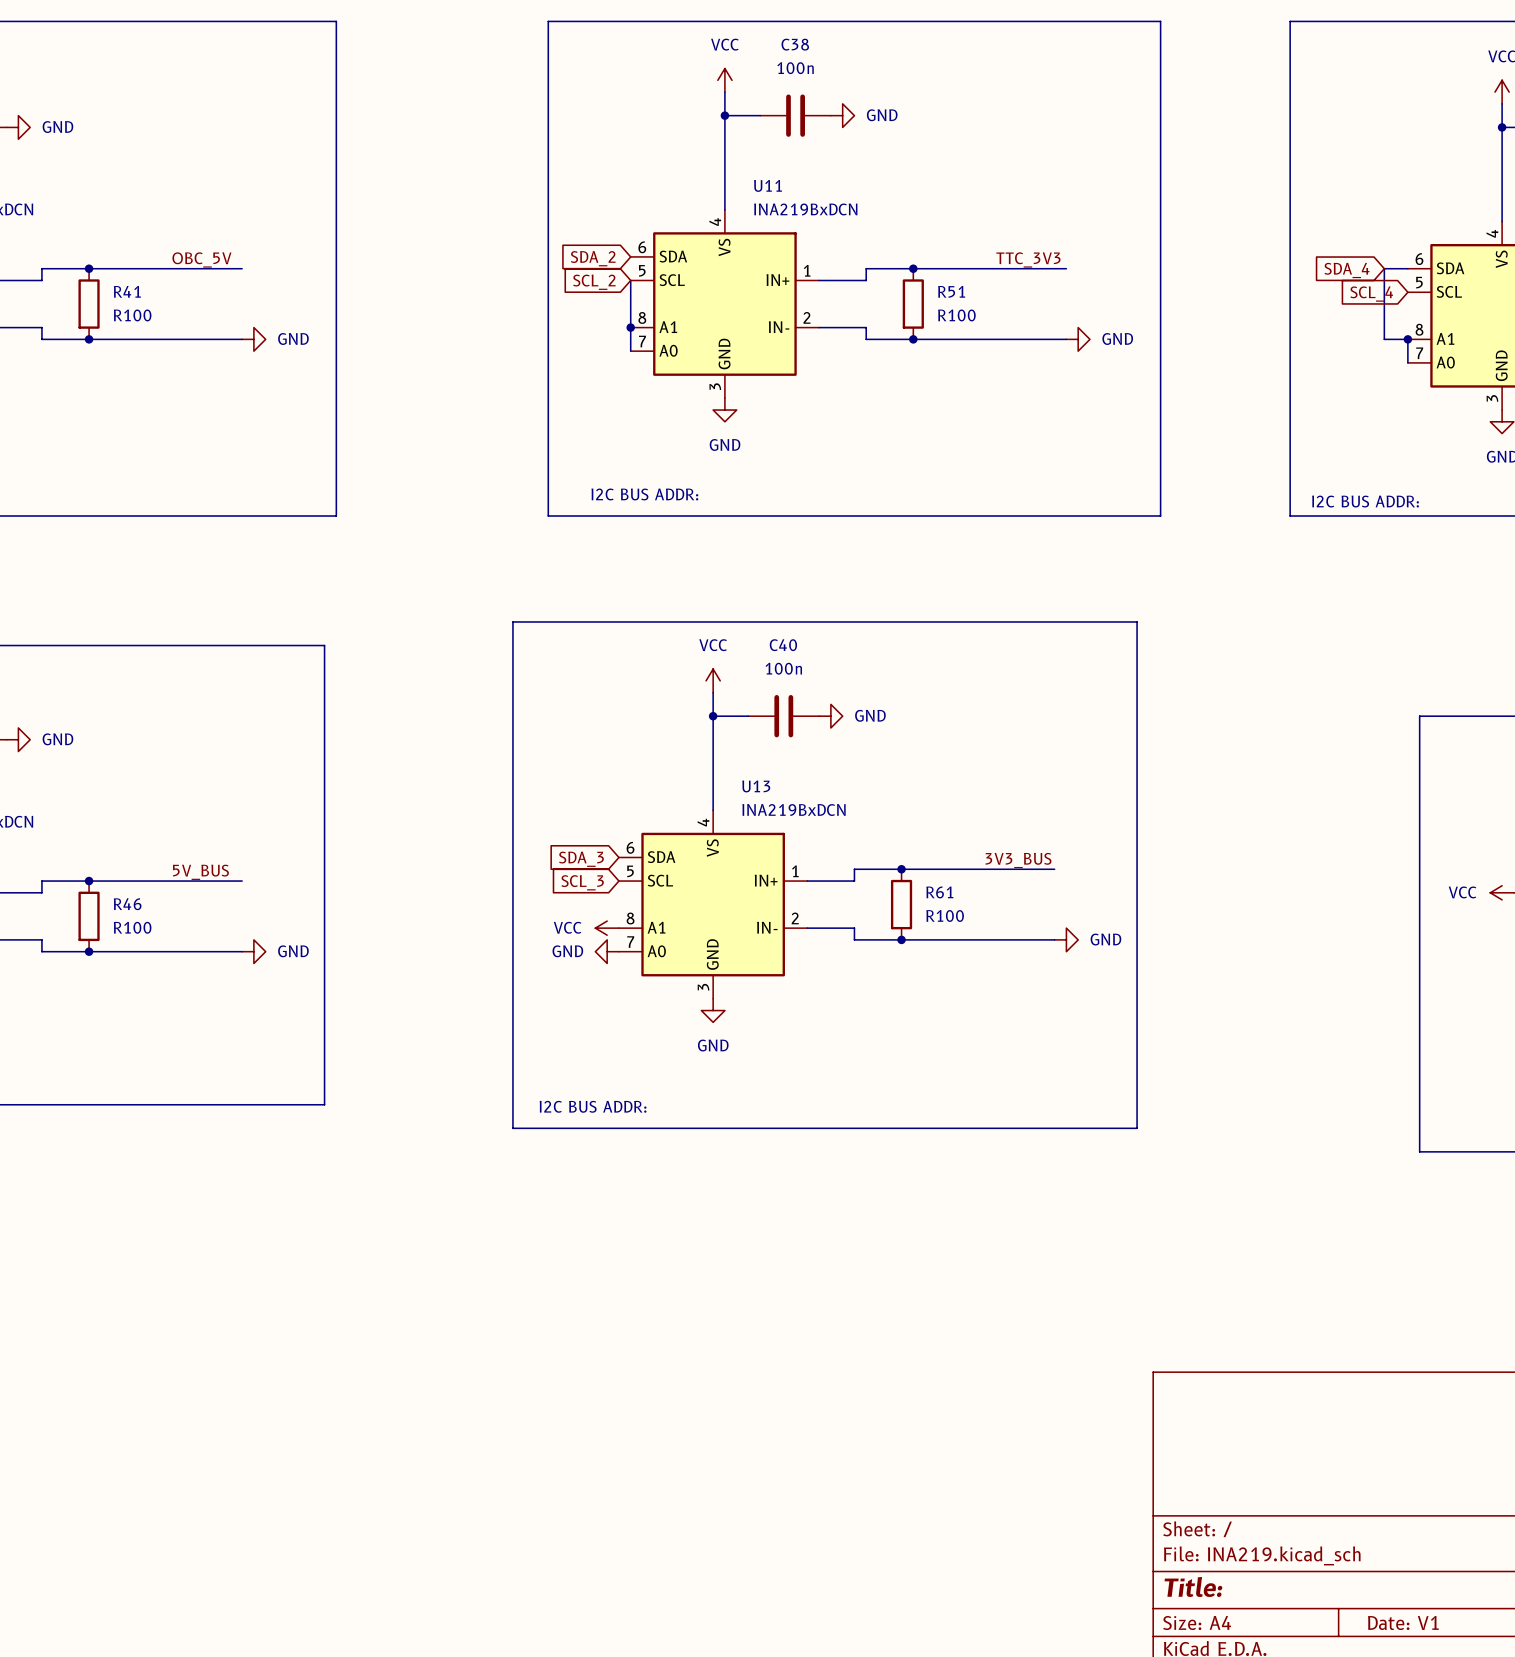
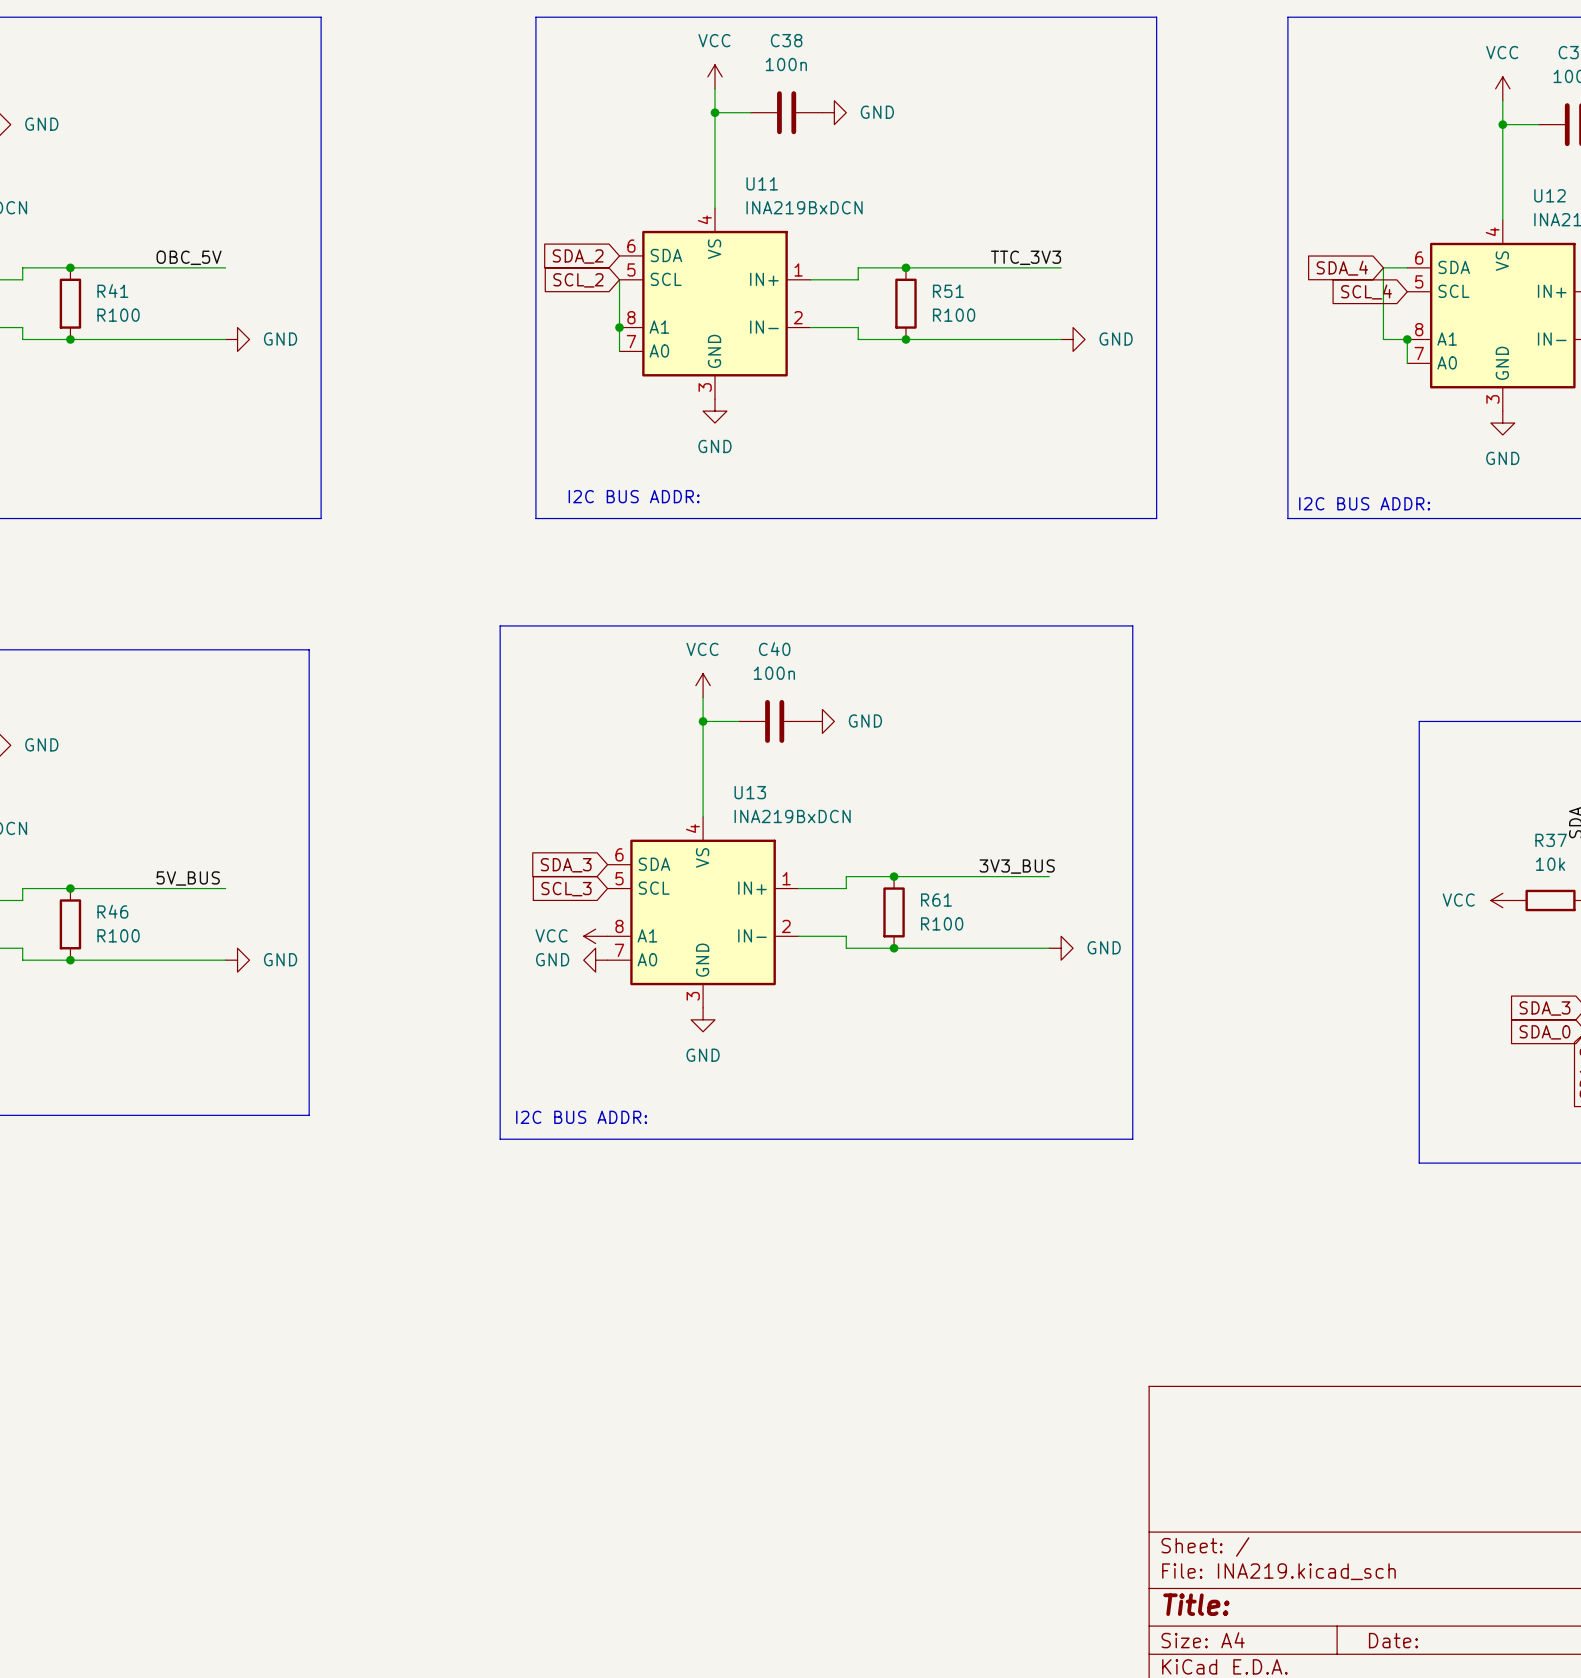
title block: Date: V1 (1403, 1623) -> Date: (1393, 1640)

